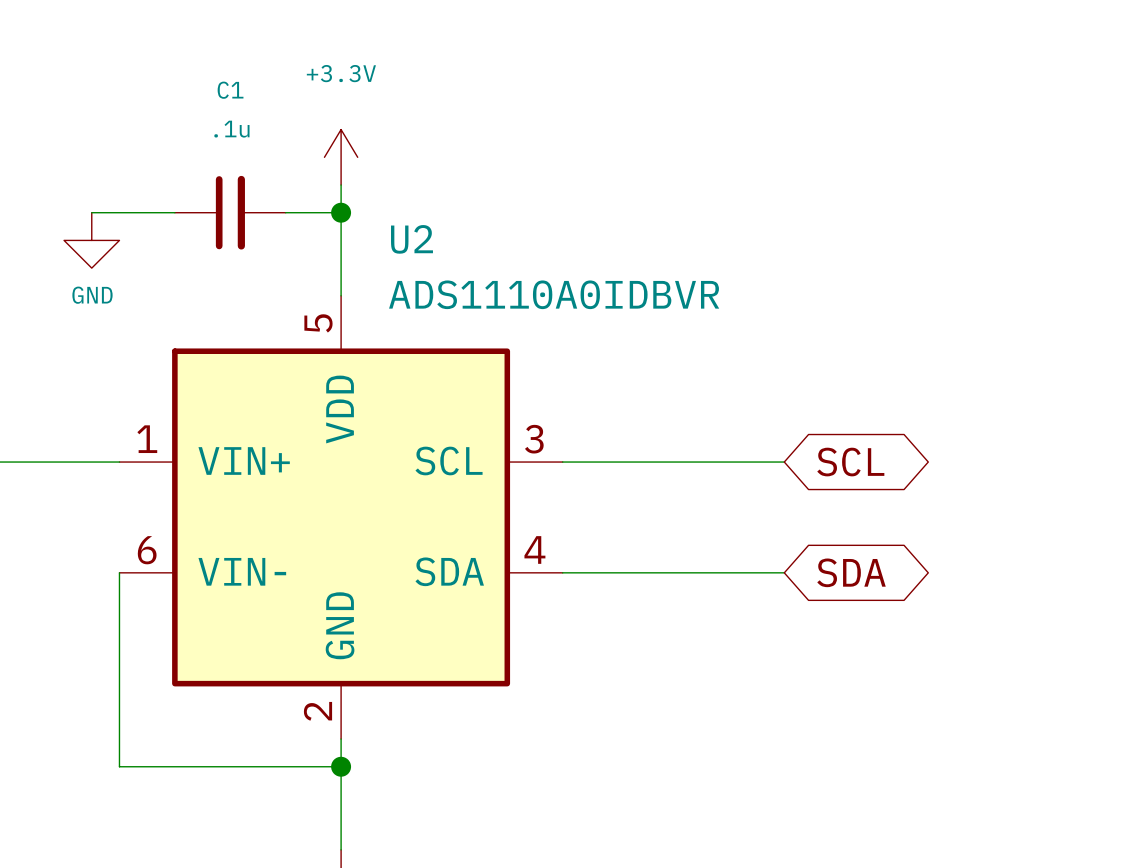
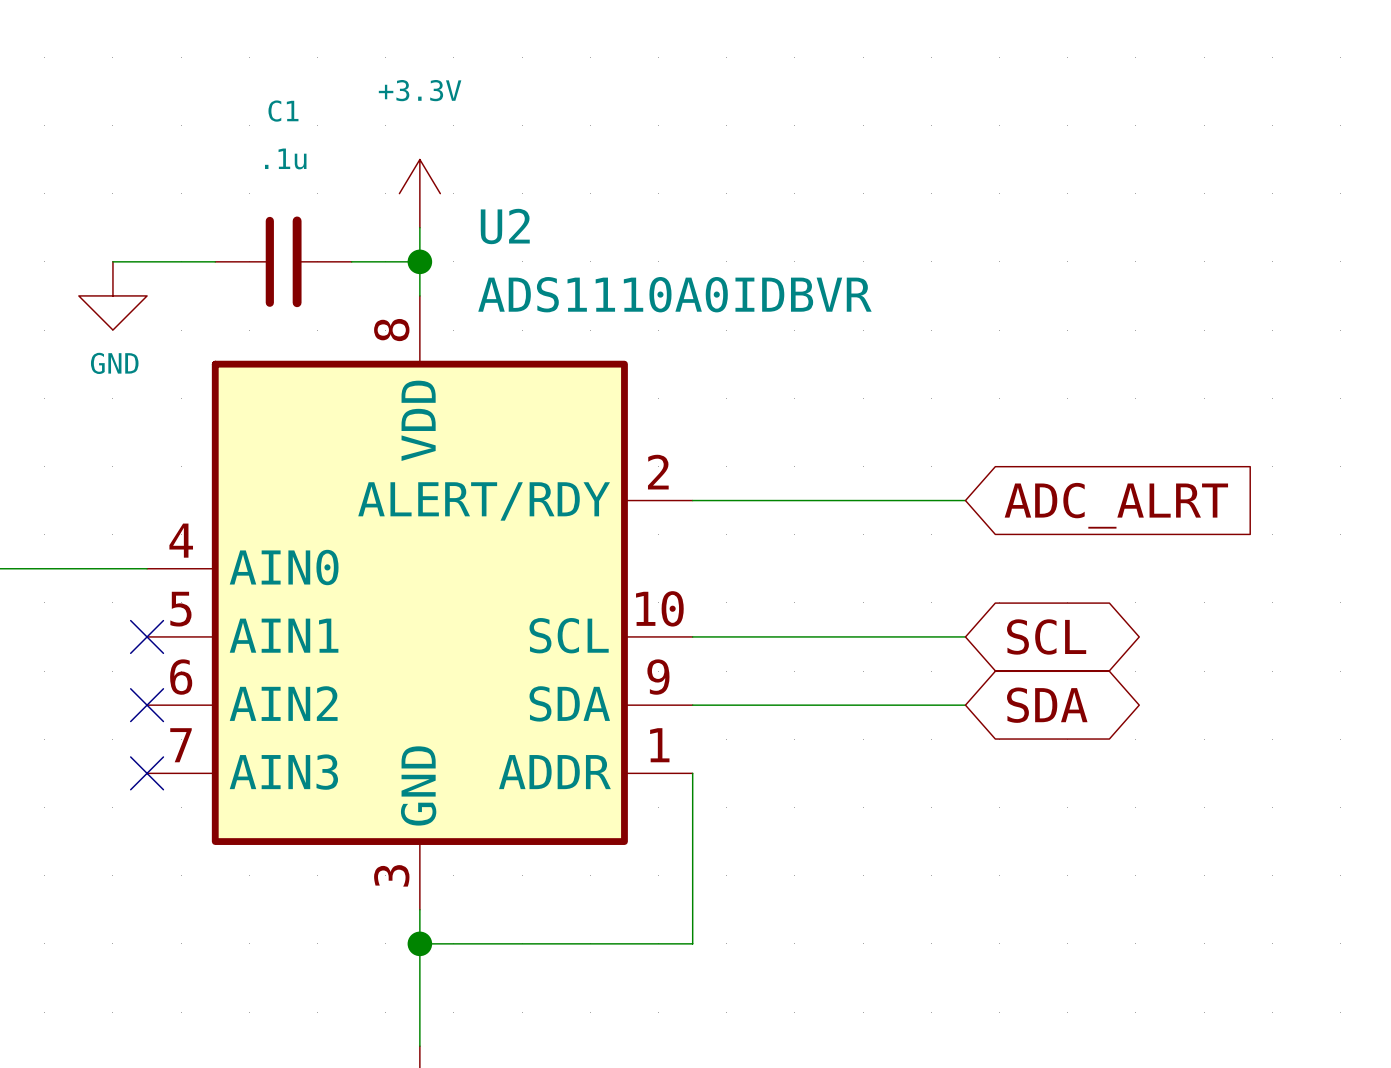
U2 symbol: [119, 295, 563, 740] -> [147, 295, 693, 910]
wire: none -> (692, 500) (965, 500)
global label: none -> ADC_ALRT (1116, 505)
wire: (562, 462) (784, 462) -> (692, 636) (965, 636)
global label position: SCL (850, 462) -> SCL (1046, 636)
no-connect mark: none -> (147, 636)
wire: (119, 572) (119, 766) (341, 766) -> (692, 773) (692, 943) (419, 943)
no-connect mark: none -> (147, 705)
no-connect mark: none -> (147, 773)

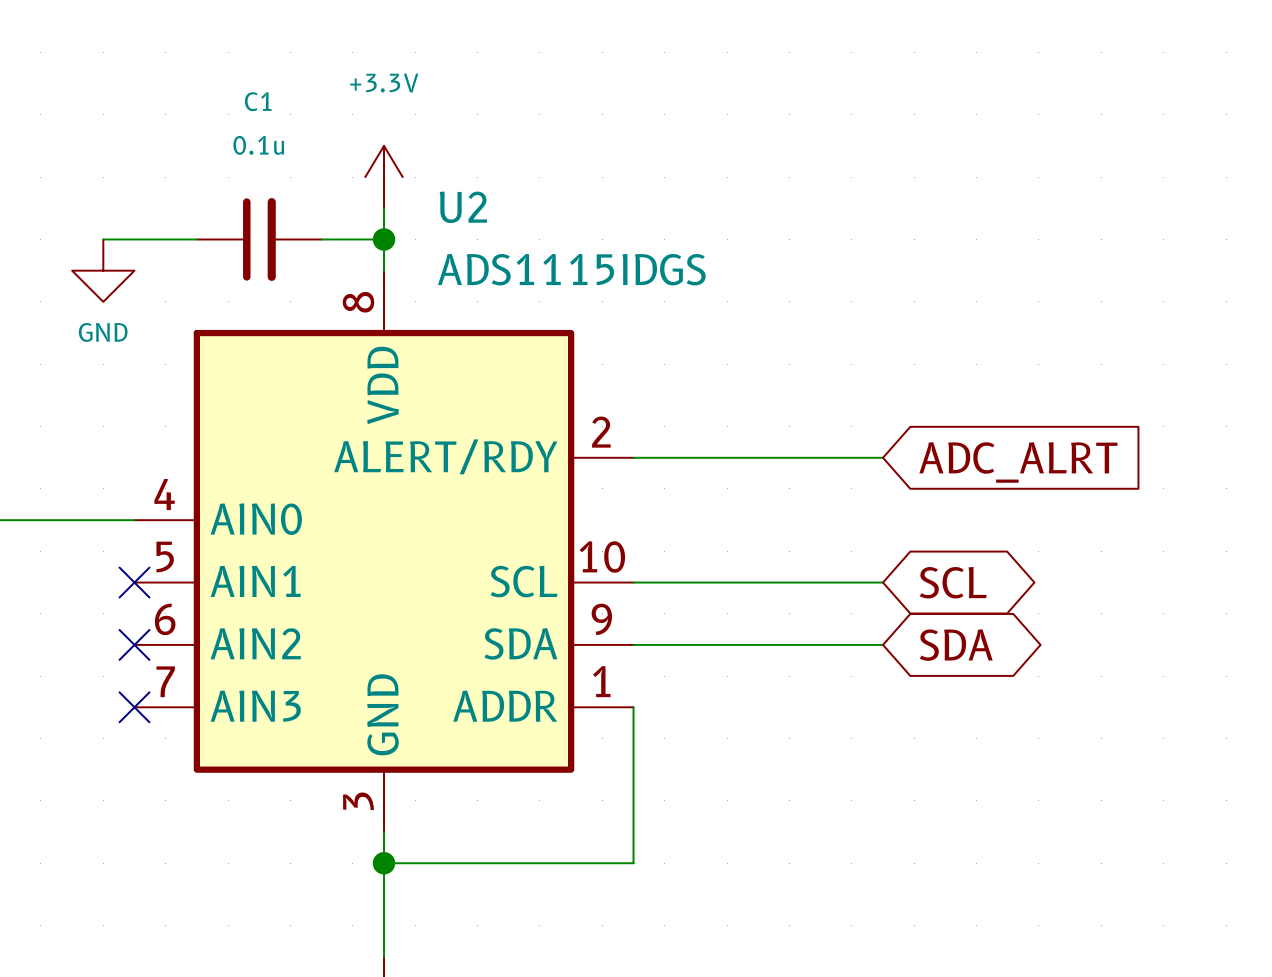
C1 value: .1u (285, 158) -> 0.1u (258, 145)
U2 value: ADS1110A0IDBVR (674, 294) -> ADS1115IDGS (571, 269)

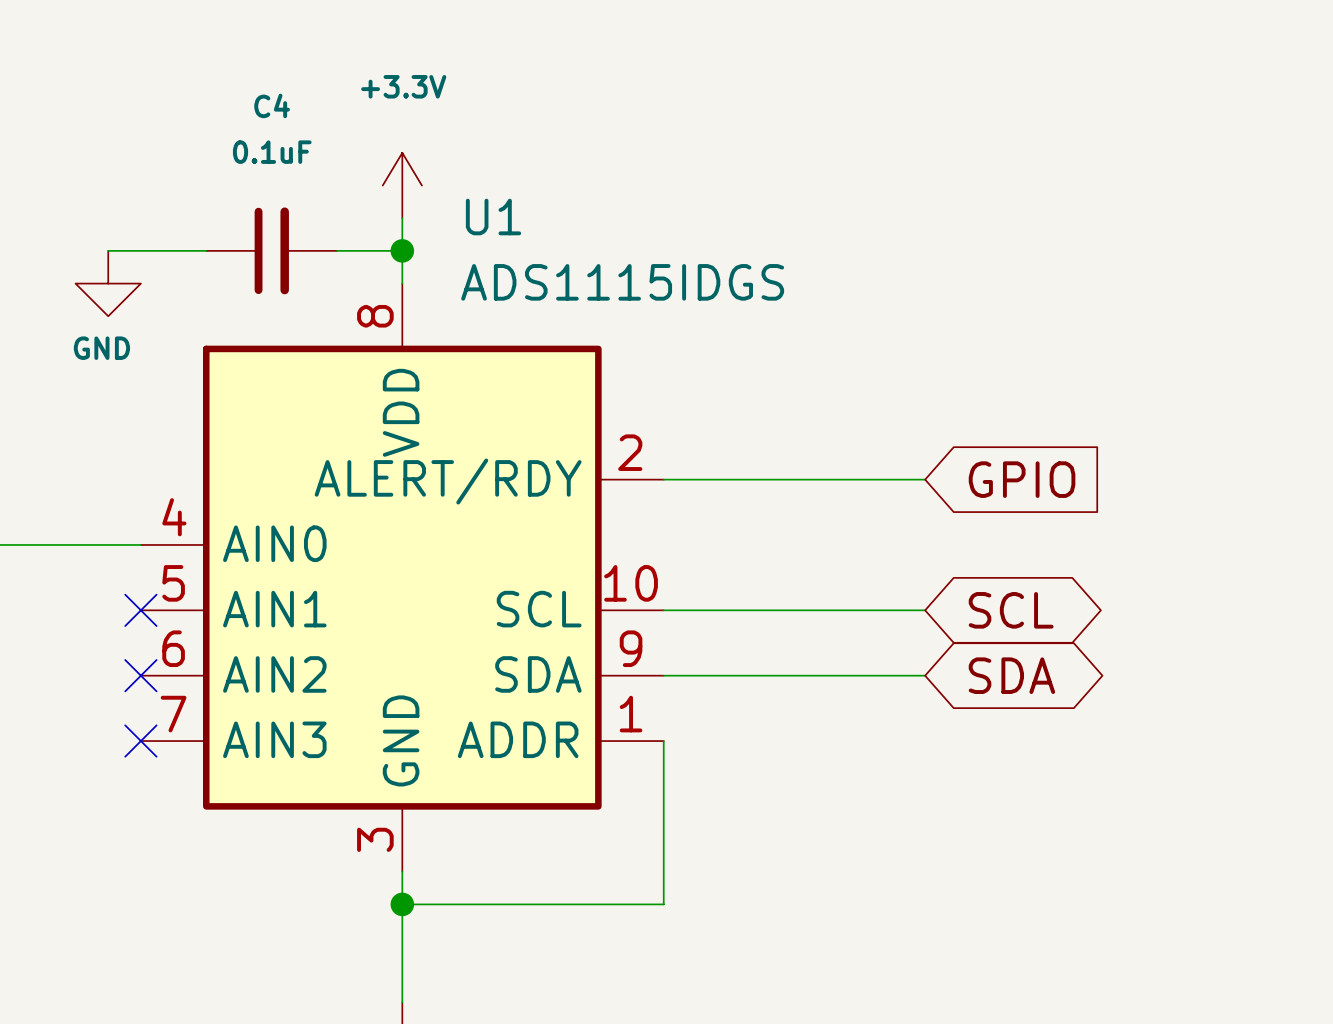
C1 name: C1 (258, 101) -> C4 (272, 105)
C1 value: 0.1u (258, 145) -> 0.1uF (272, 152)
U2 name: U2 (463, 207) -> U1 (493, 217)
global label: ADC_ALRT (1018, 462) -> GPIO (1022, 479)

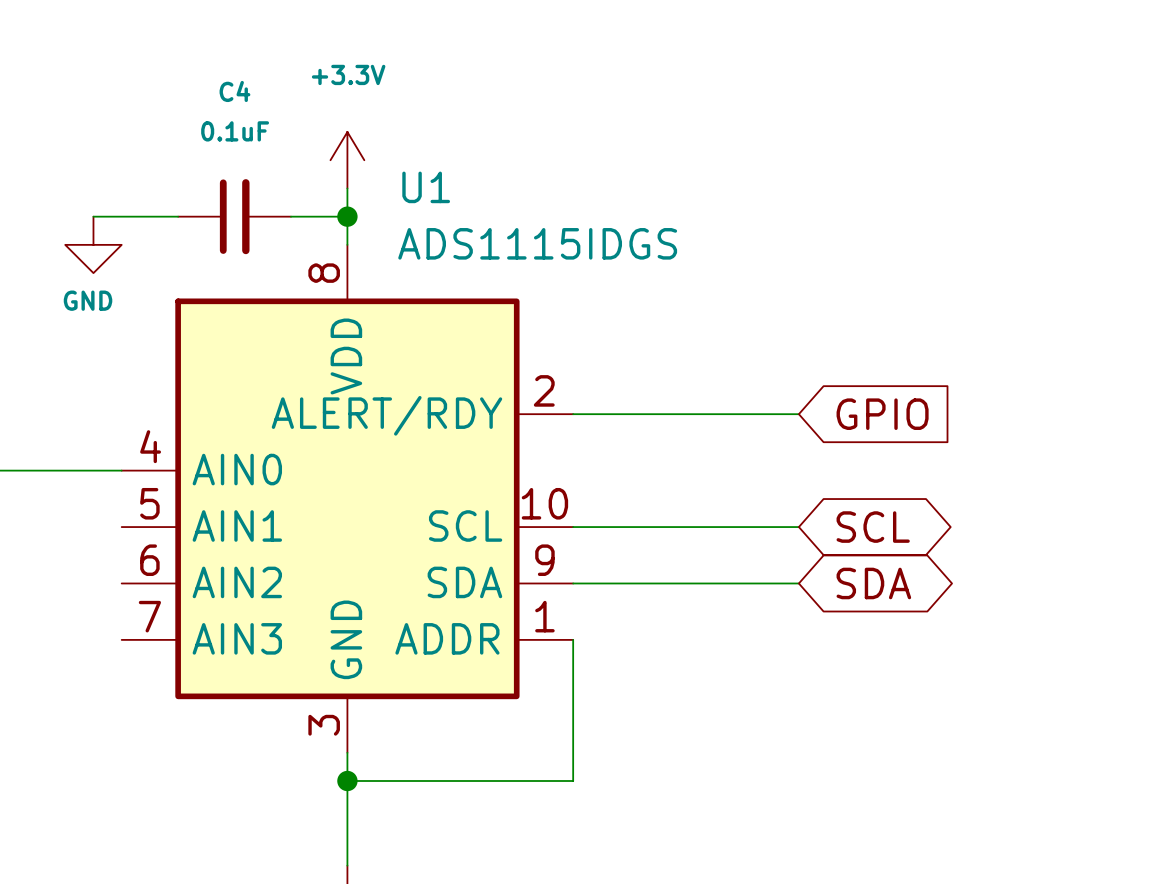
no-connect mark: (140, 610) -> none
no-connect mark: (140, 675) -> none
no-connect mark: (140, 741) -> none

